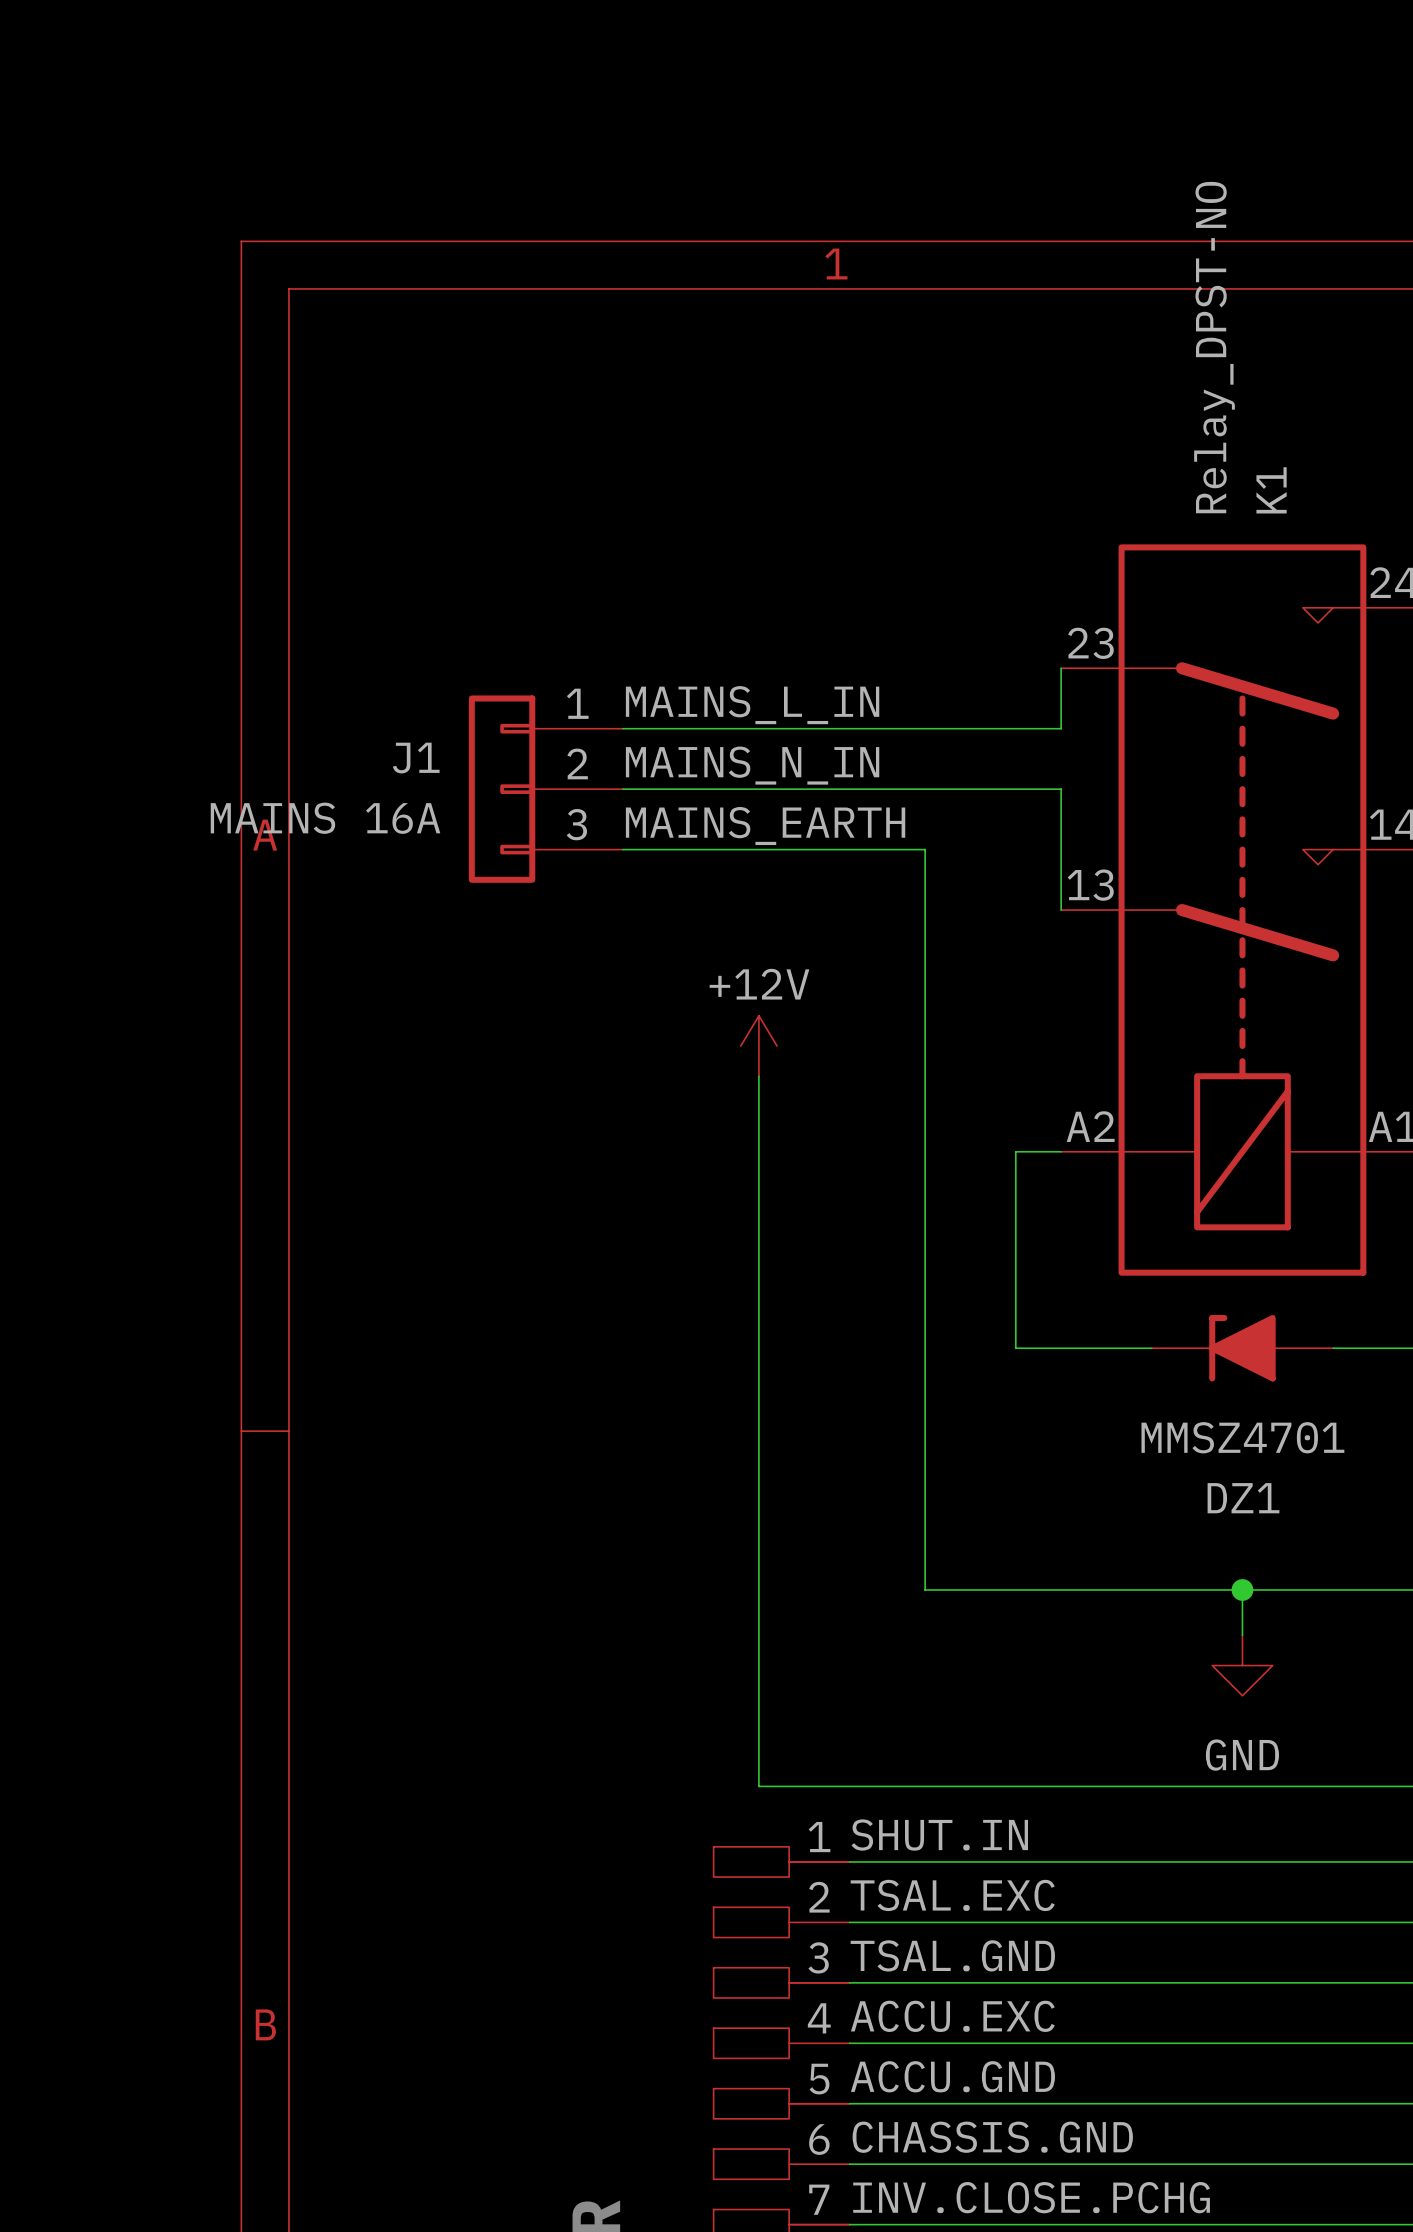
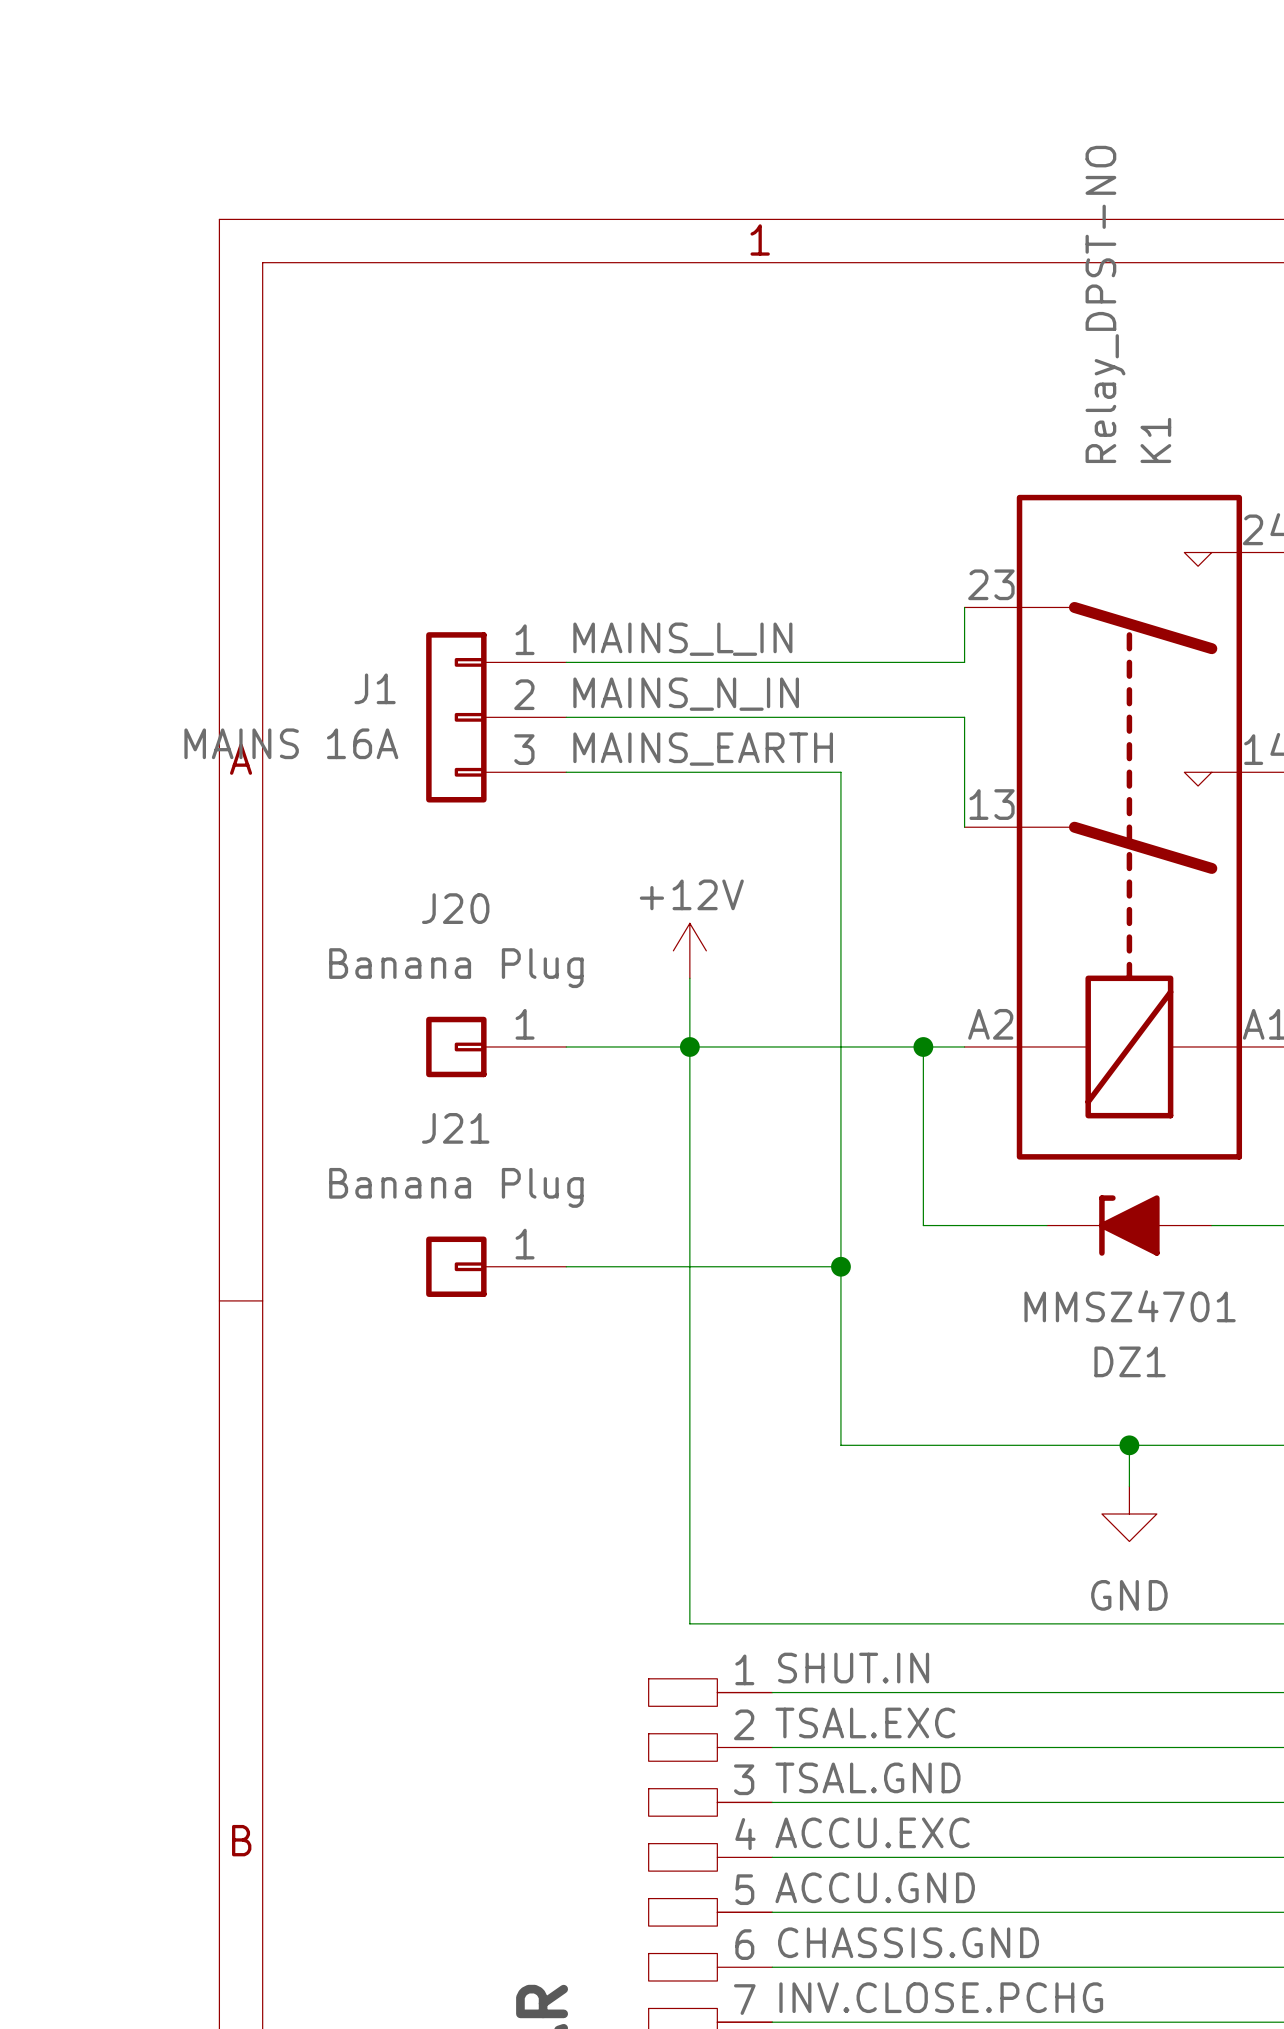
J20: none -> Banana Plug (496, 1046)
wire: none -> (566, 1046) (923, 1046)
junction: none -> (689, 1046)
junction: none -> (923, 1046)
J21: none -> Banana Plug (496, 1266)
wire: none -> (566, 1266) (840, 1266)
junction: none -> (840, 1266)

